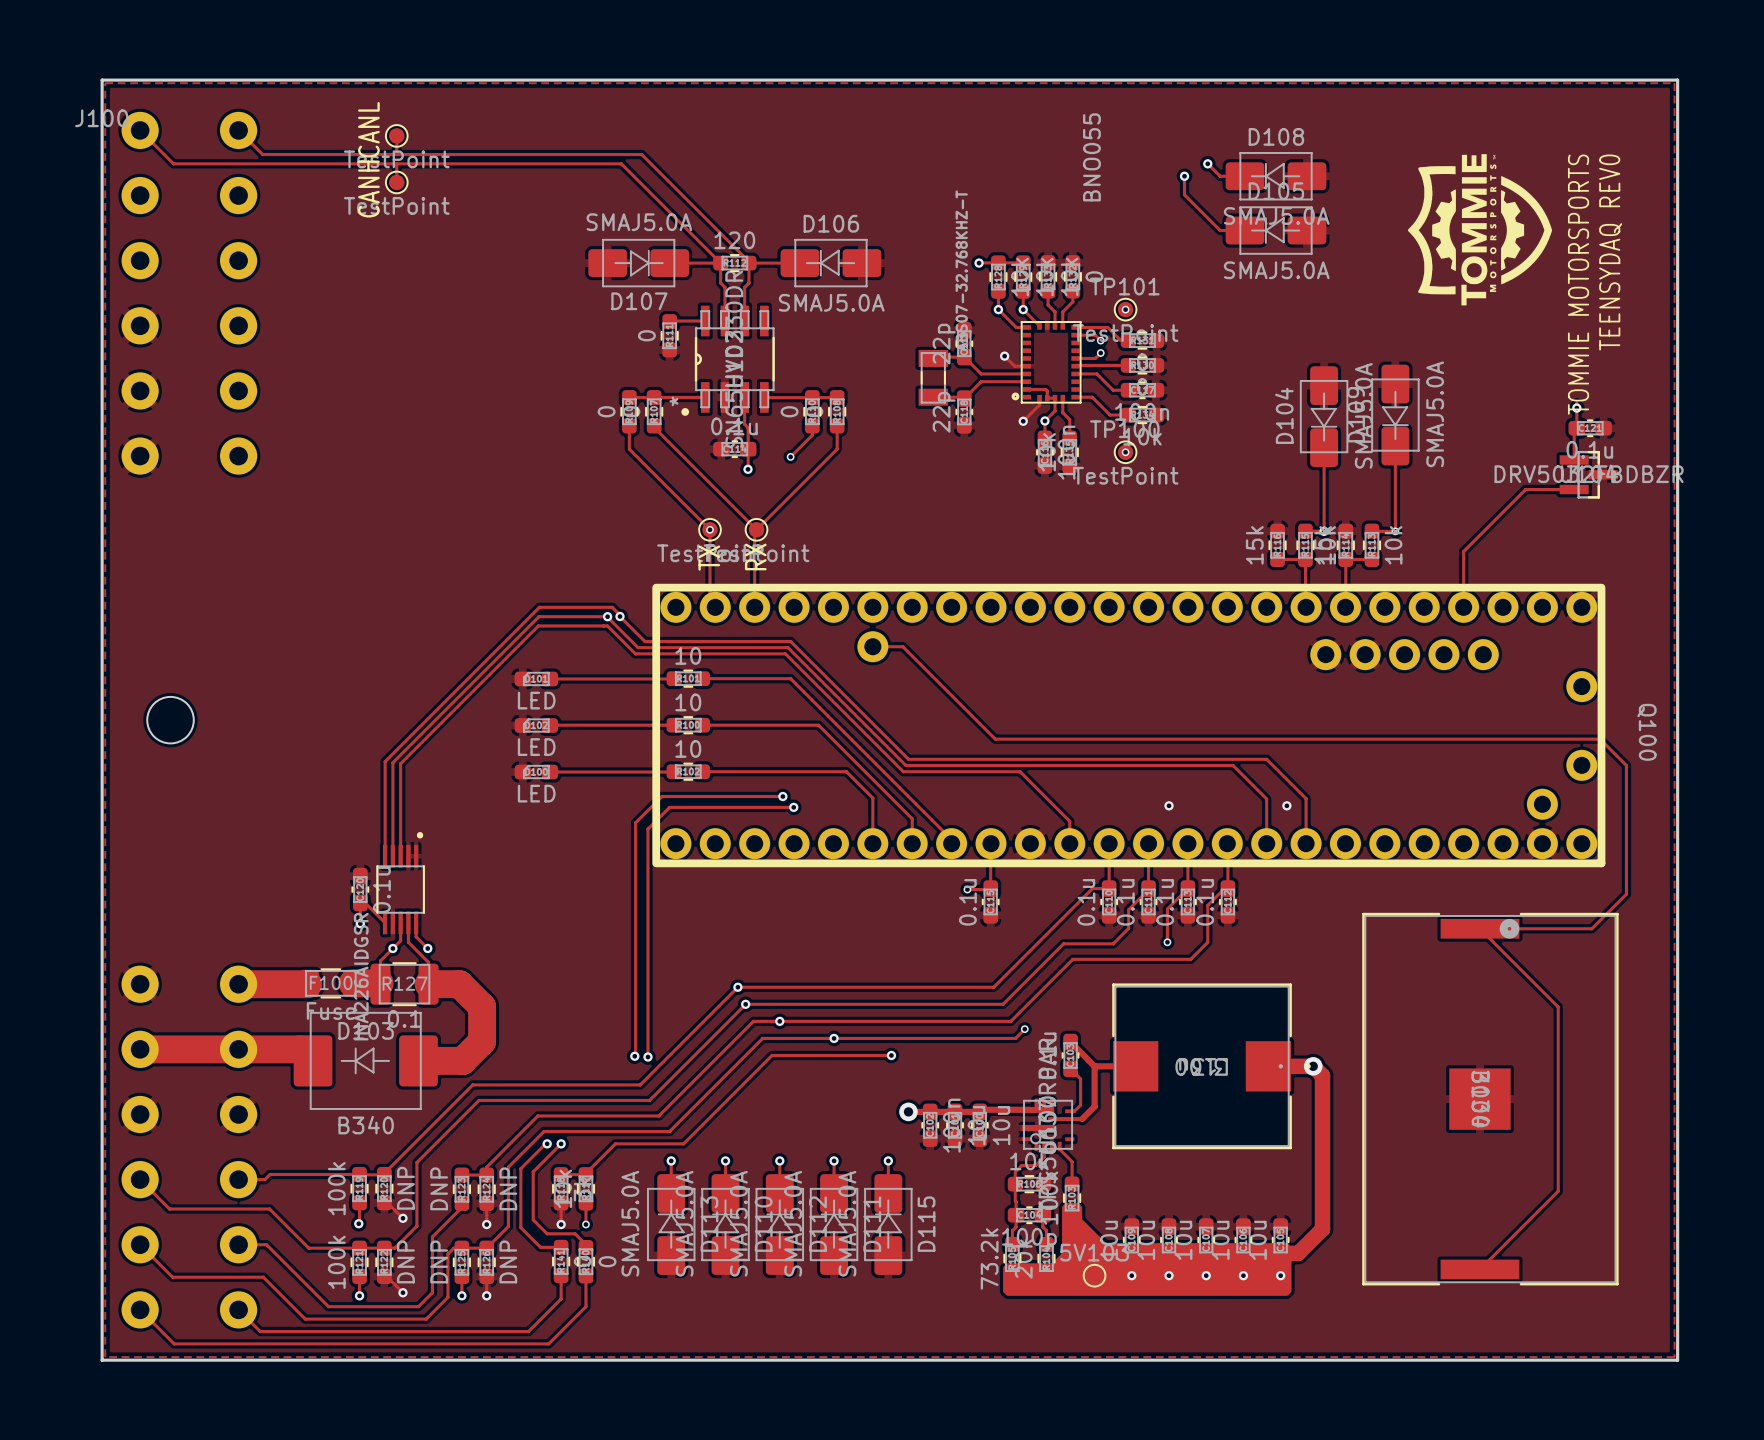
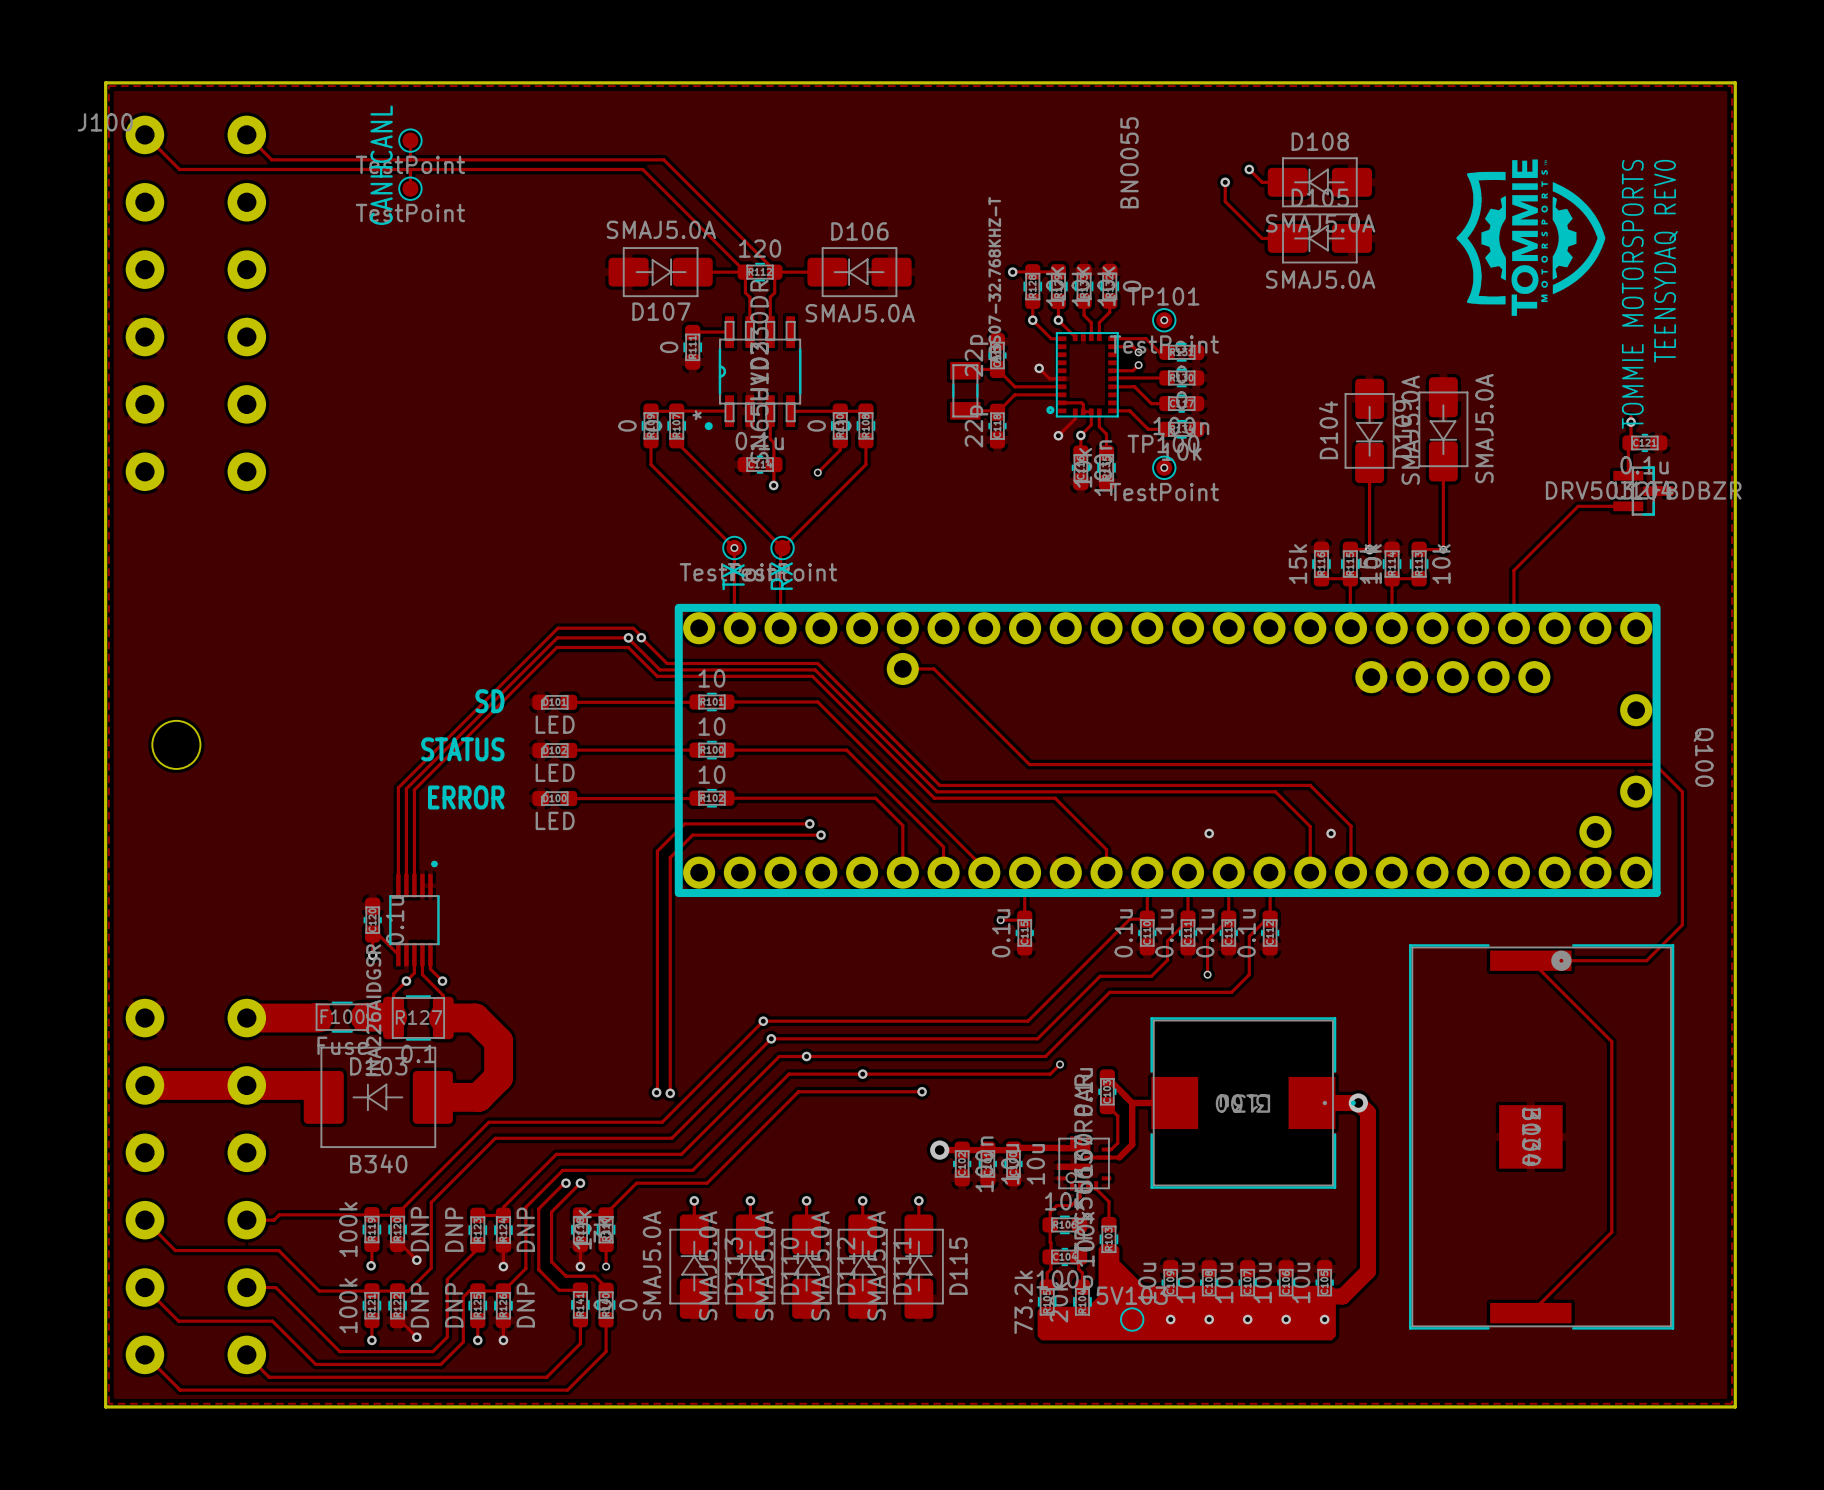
text: none -> SD (489, 701)
text: none -> STATUS (462, 749)
text: none -> ERROR (466, 797)

